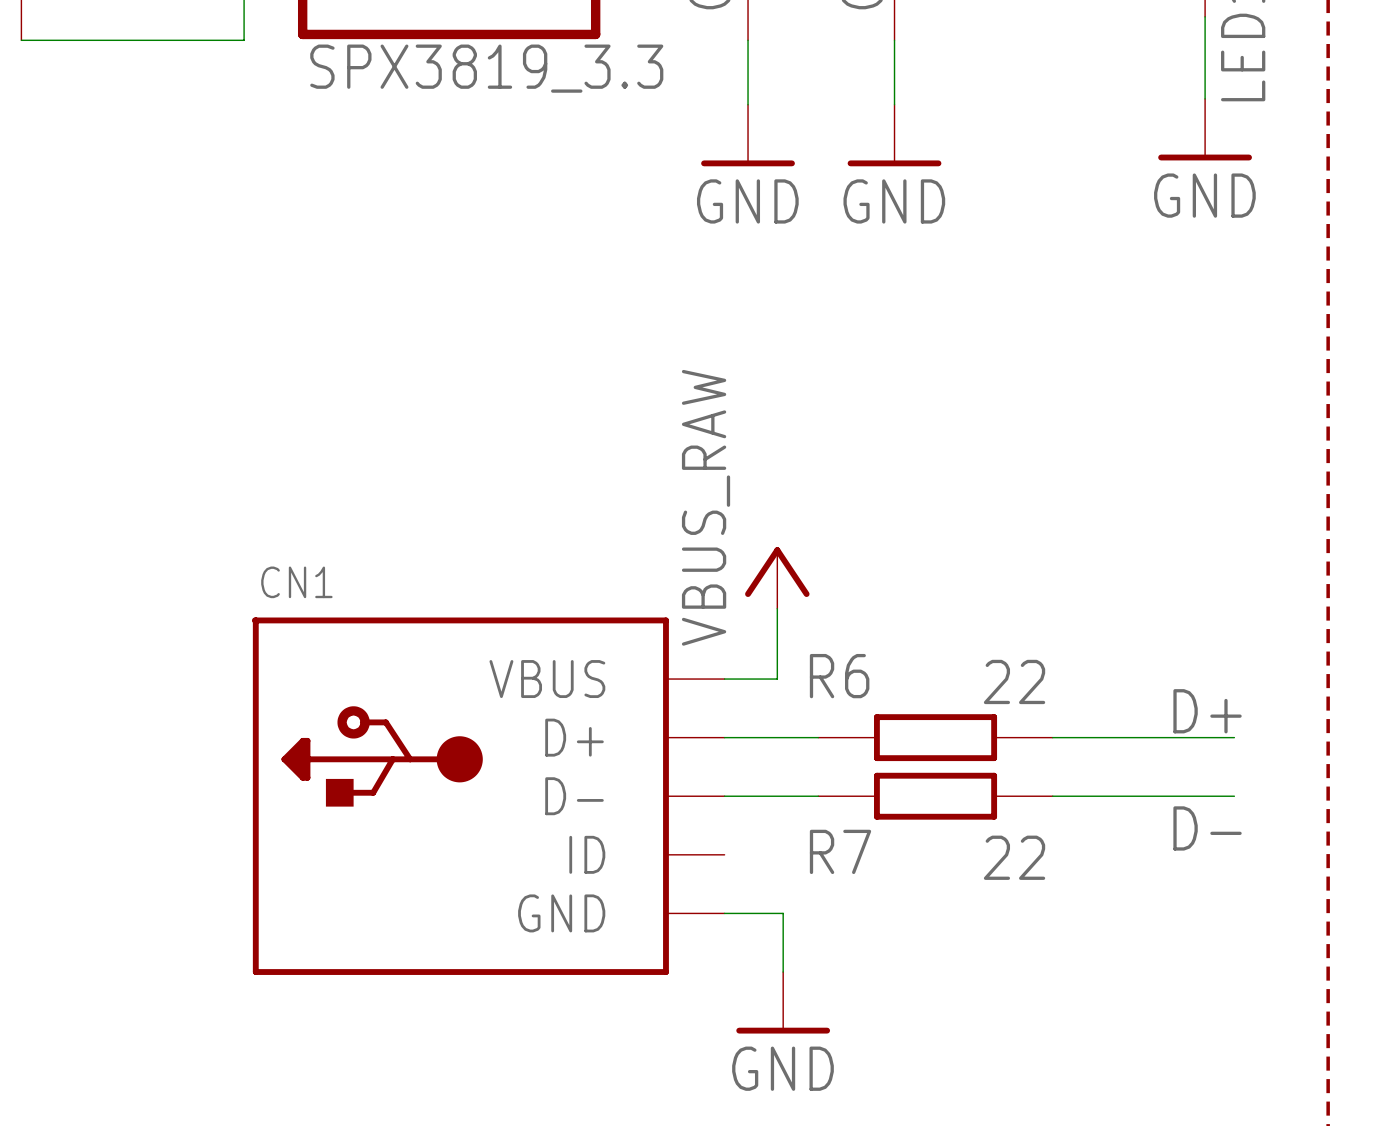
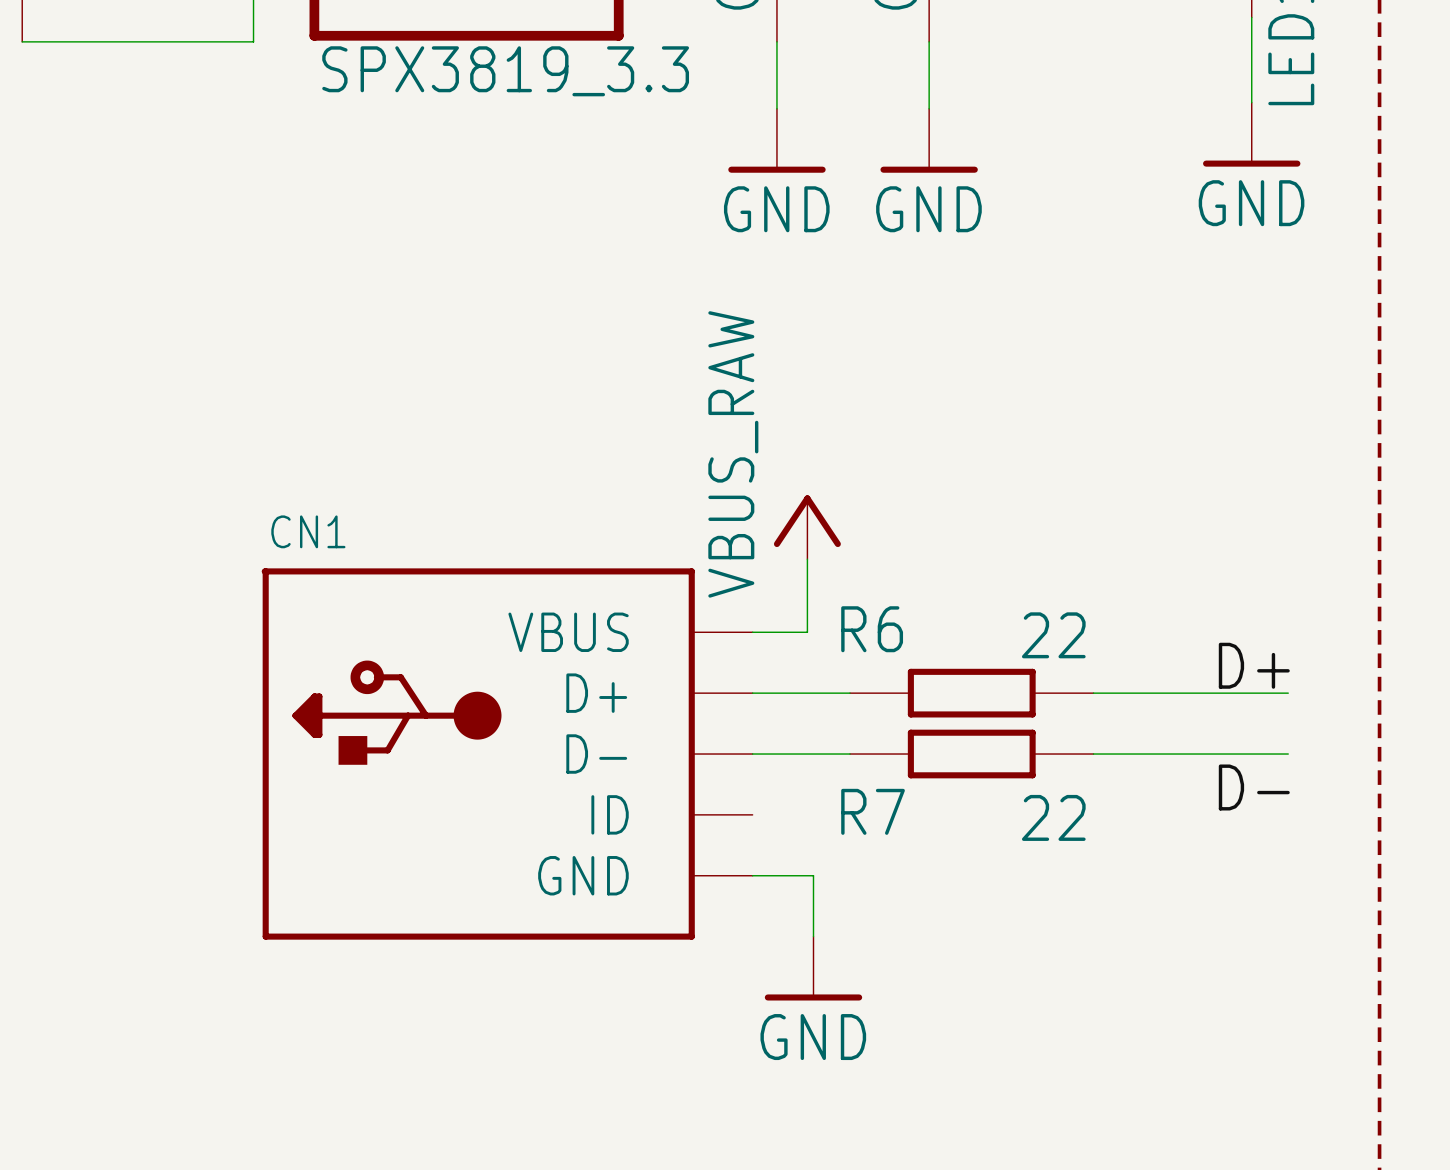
power symbol position: VBUS_RAW (777, 577) -> VBUS_RAW (807, 527)
wire: (777, 608) (777, 679) (724, 679) -> (807, 559) (807, 632) (752, 632)
wire: none -> (1093, 693) (1288, 693)
label position: D+ (1207, 711) -> D+ (1254, 665)
wire: none -> (1093, 754) (1288, 754)
wire: (724, 737) (818, 737) -> (752, 693) (850, 693)
R6 position: (935, 737) -> (971, 693)
wire: (1052, 737) (1234, 737) -> none
CN1 position: (488, 796) -> (507, 754)
wire: (724, 796) (818, 796) -> (752, 754) (850, 754)
R7 position: (935, 796) -> (971, 754)
wire: (1052, 796) (1234, 796) -> none
label position: D- (1207, 828) -> D- (1254, 787)
wire: (724, 913) (783, 913) (783, 972) -> (752, 875) (813, 875) (813, 936)
power symbol position: GND (783, 1002) -> GND (813, 968)

